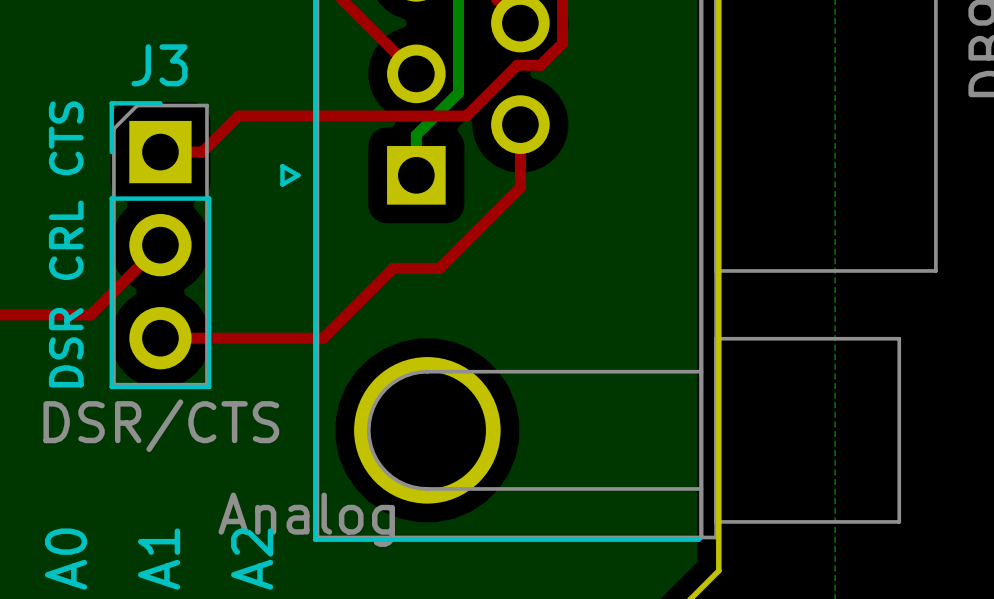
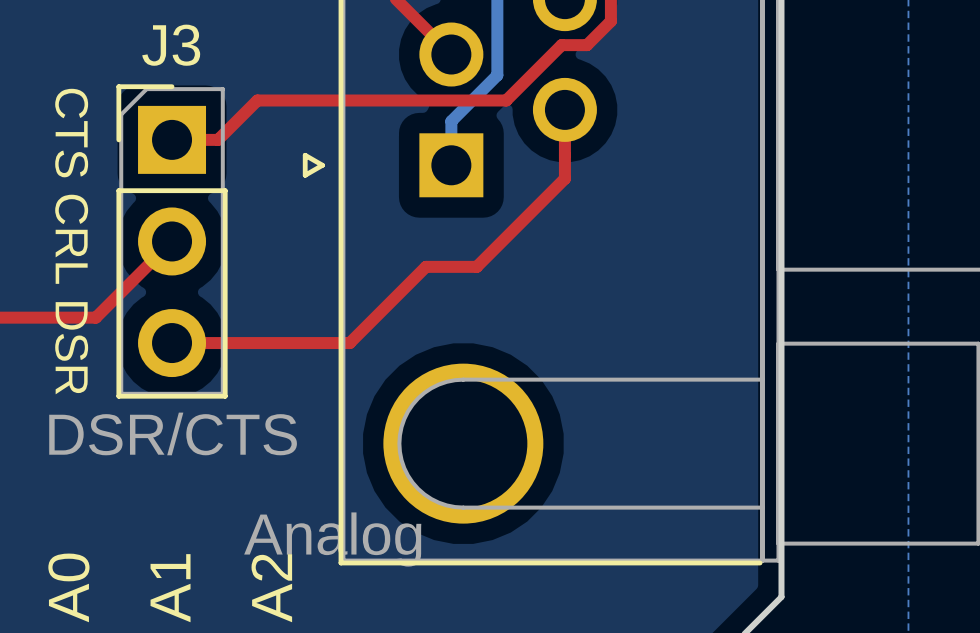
text: DSR CRL CTS (66, 244) -> CTS CRL DSR (71, 241)

